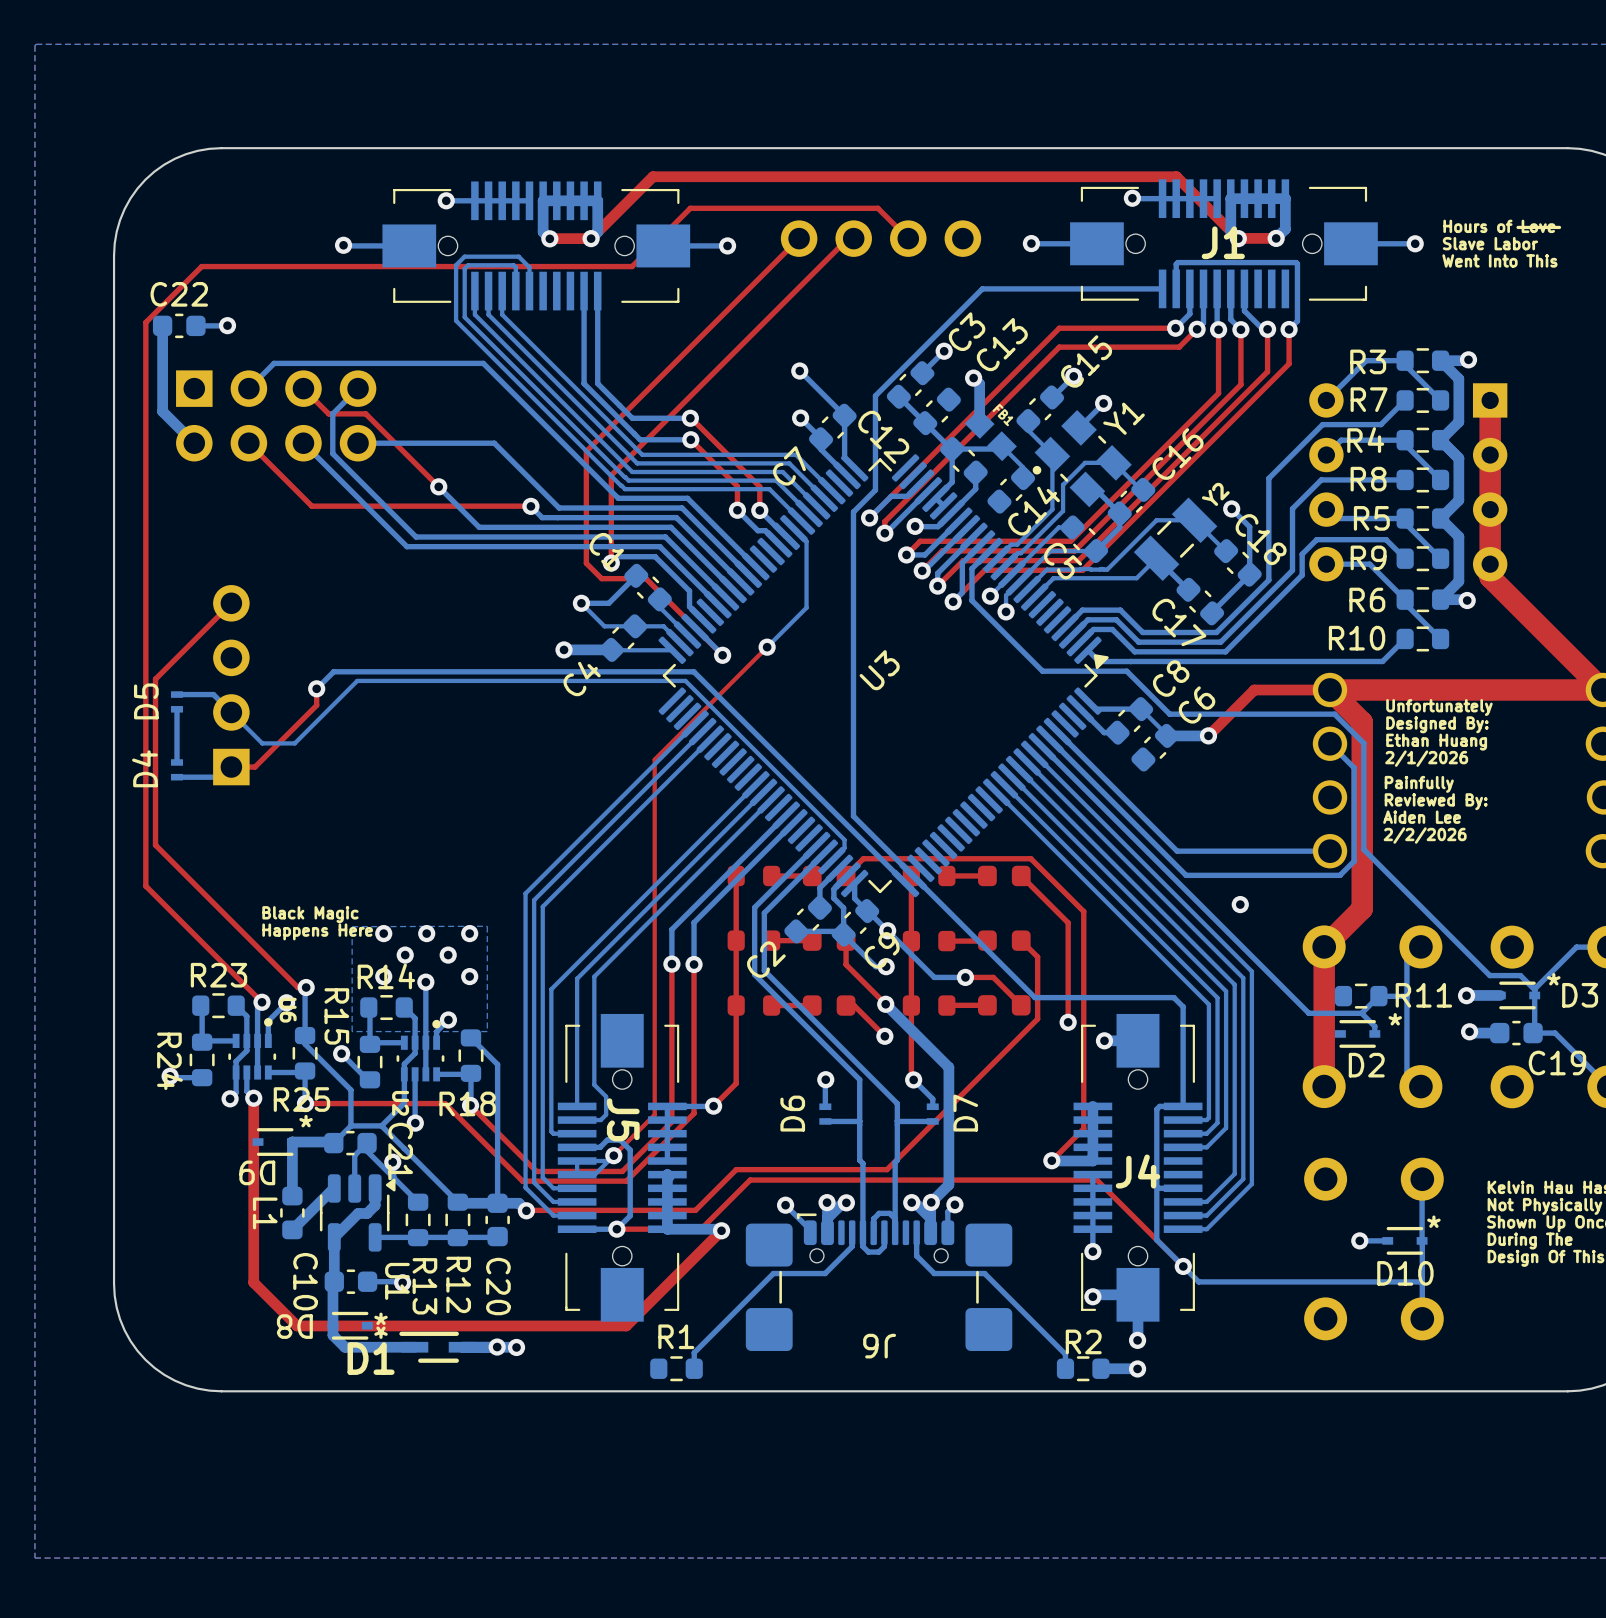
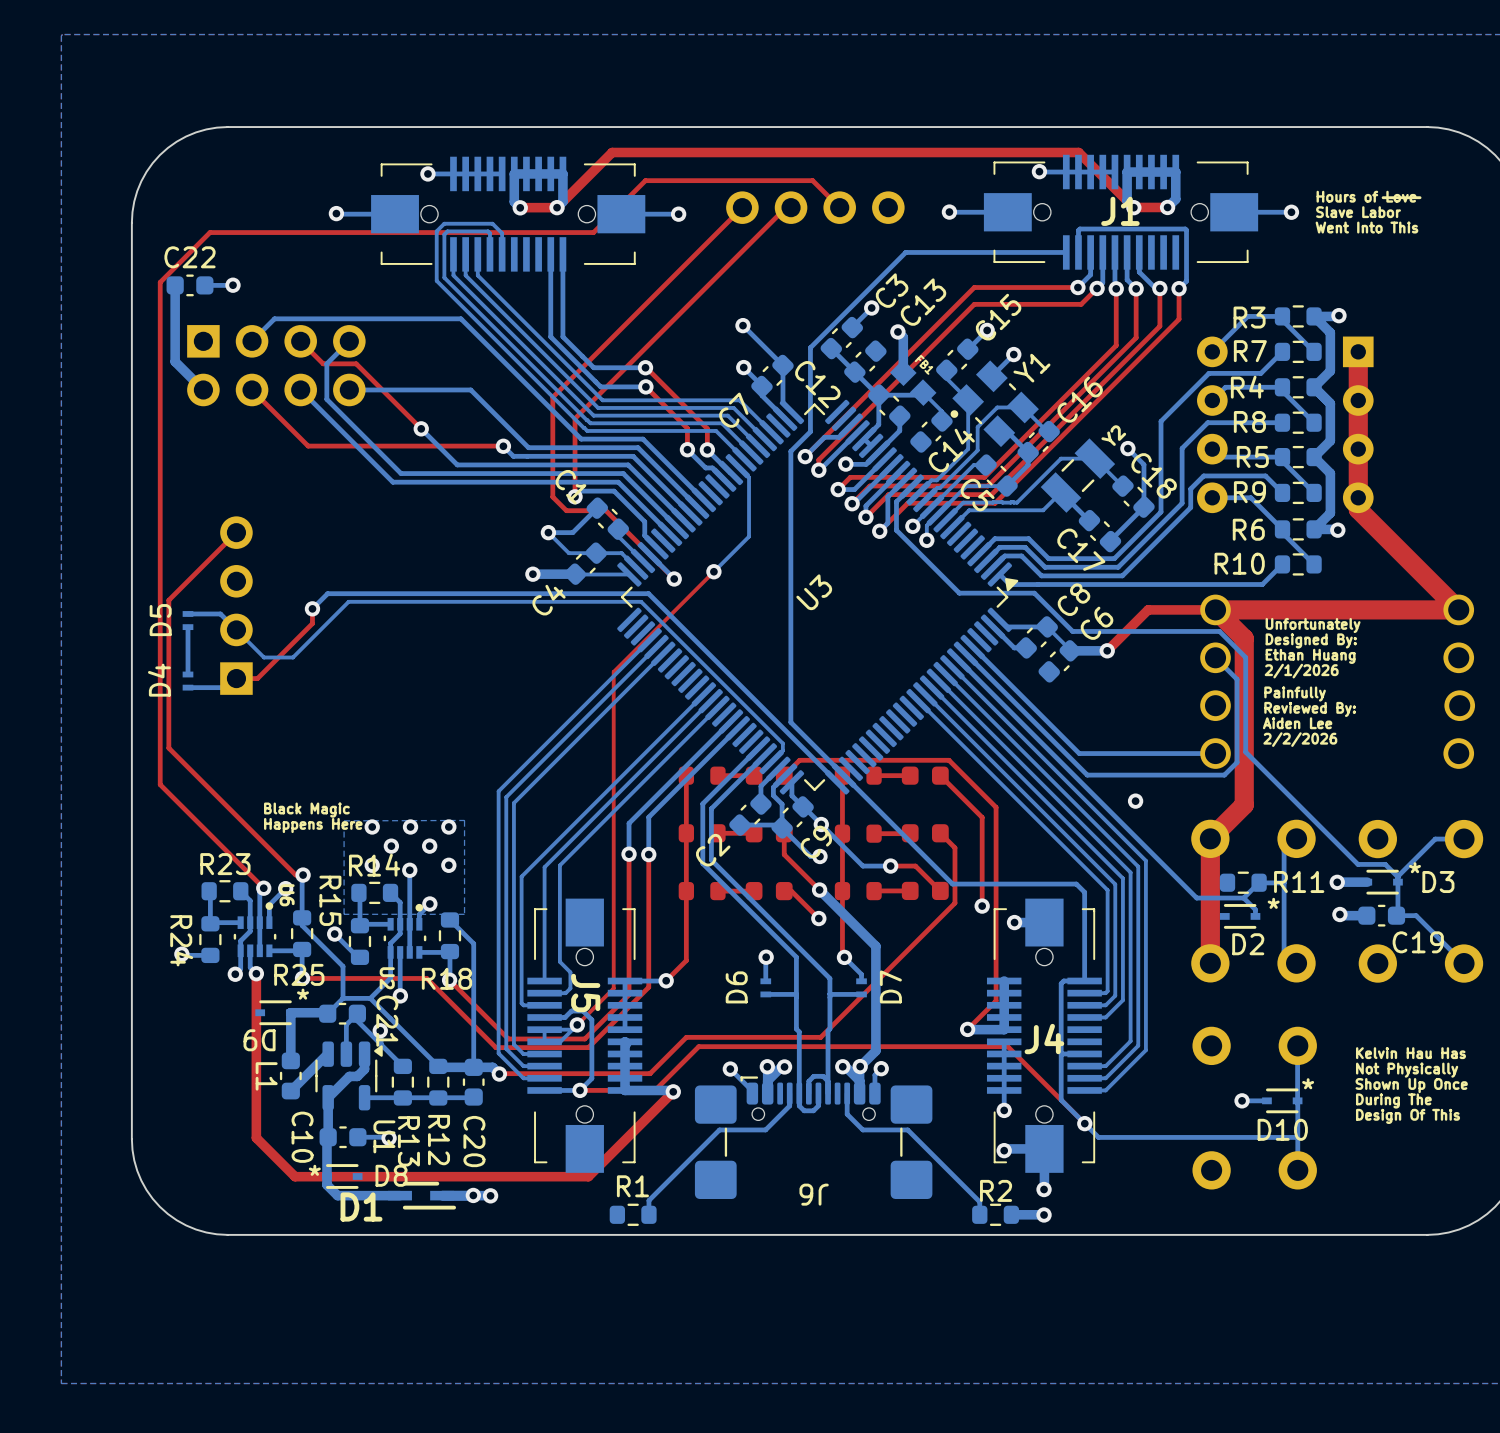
D8 rotation: 0° (350, 1325) -> 180° (342, 1176)
D1 rotation: 0° (437, 1347) -> 180° (422, 1195)

